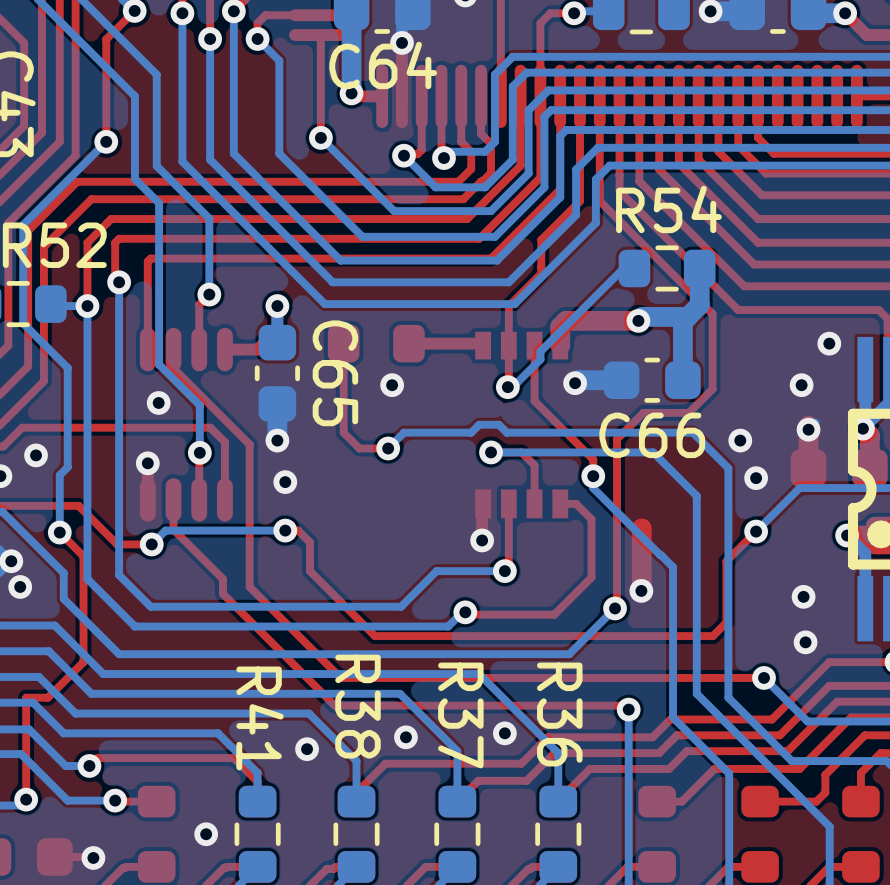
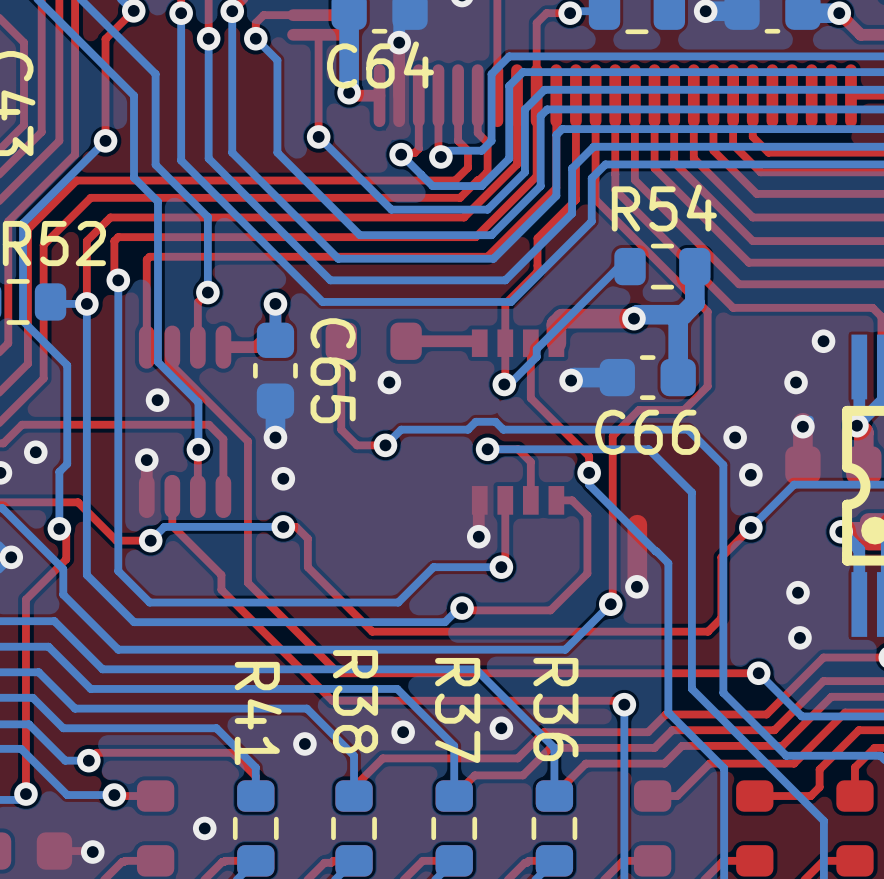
top track: (66, 539) (83, 556) (83, 662) (47, 697) (26, 697) -> (66, 535) (66, 559) (25, 599) (25, 692)
via: (20, 586) -> none

